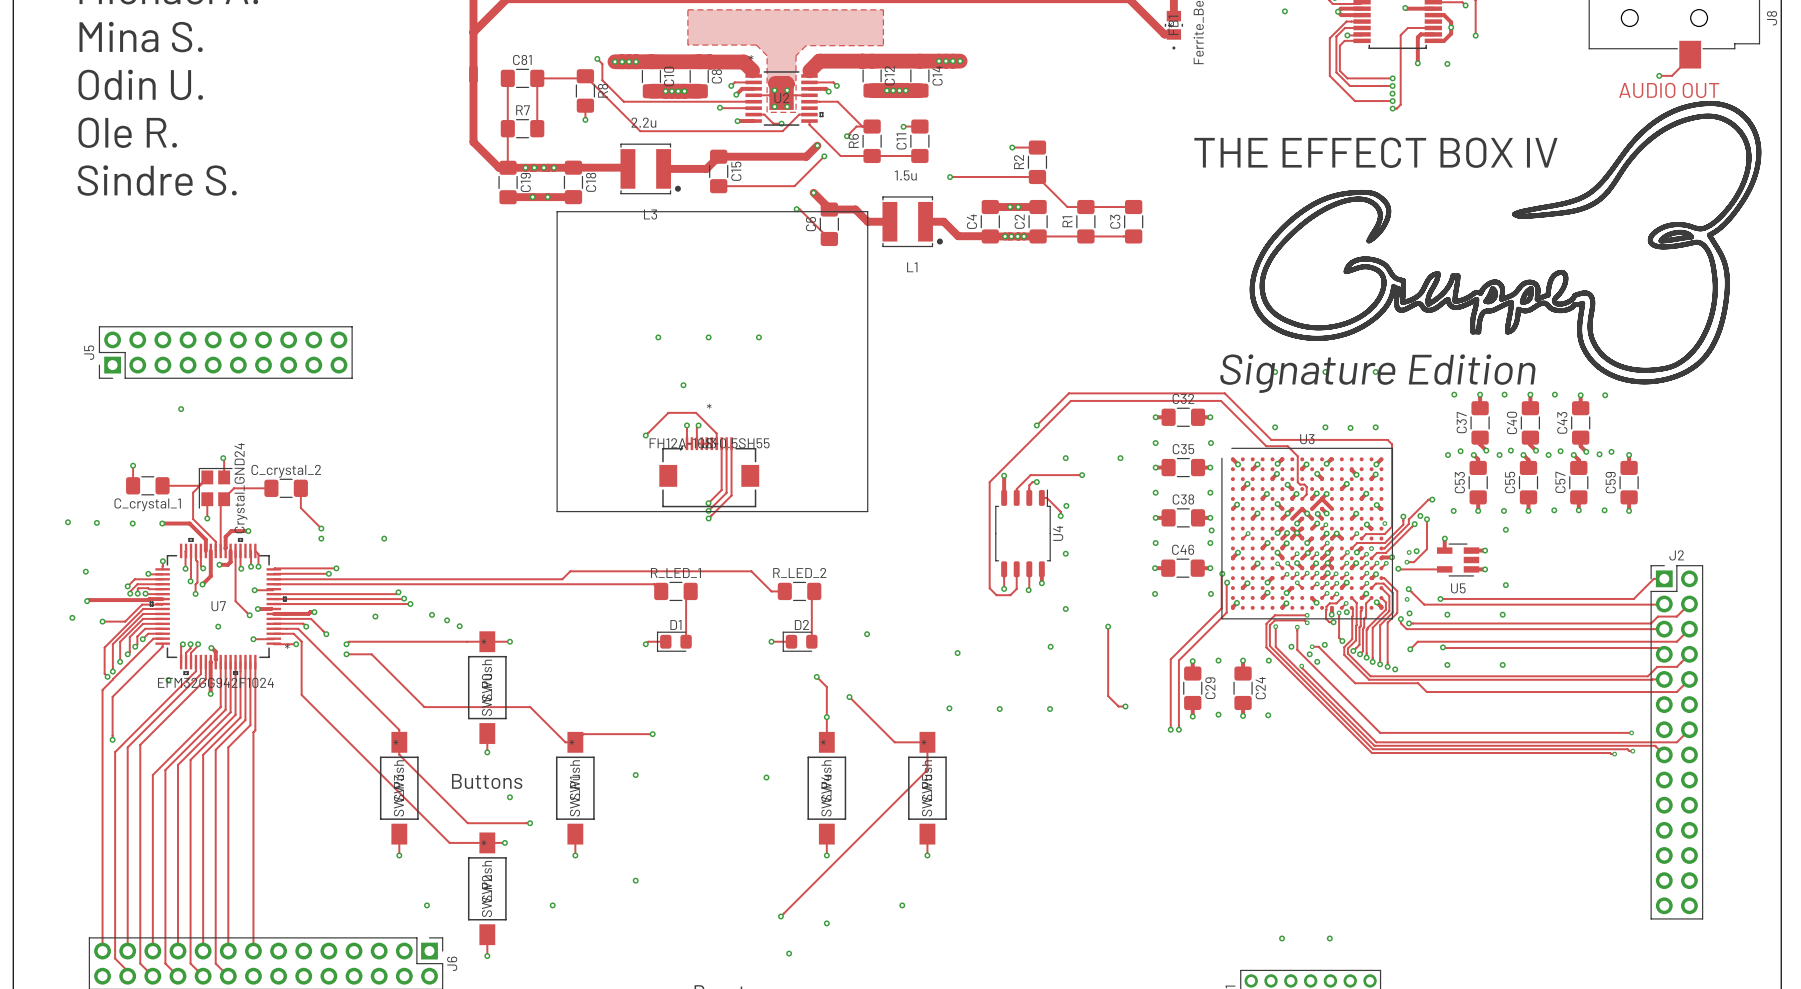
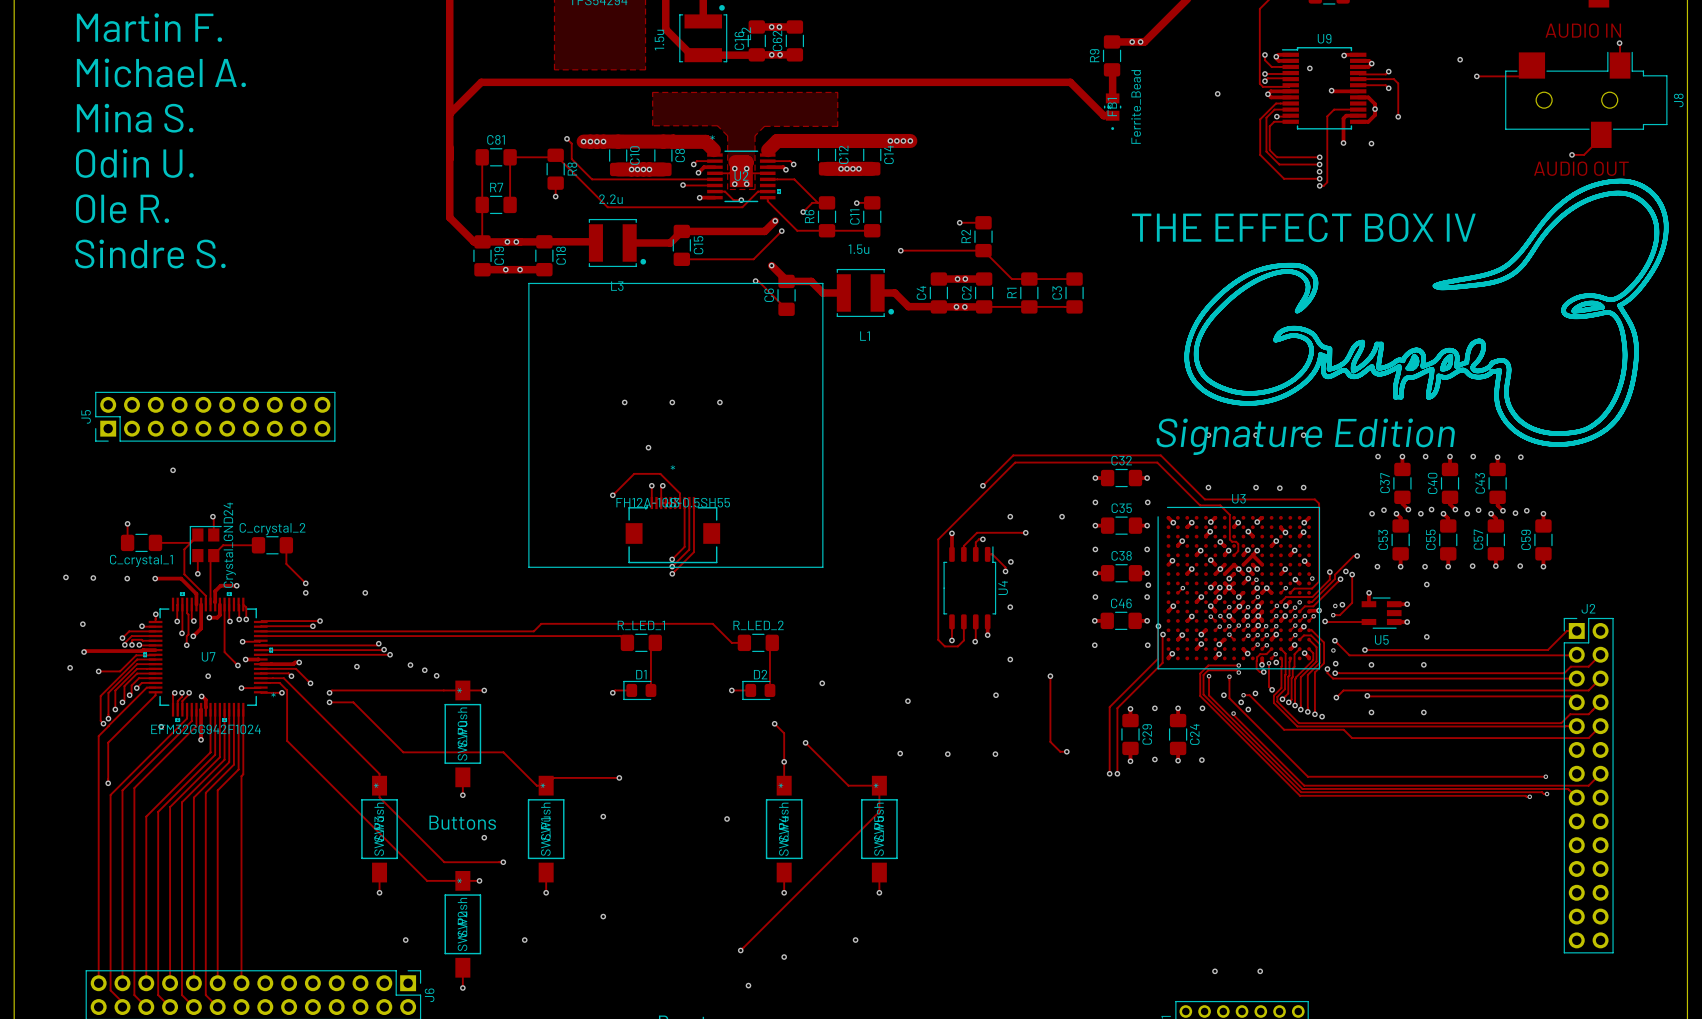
via: (525, 167) -> none
via: (553, 167) -> none
via: (1005, 236) -> none
via: none -> (956, 306)
via: (1011, 236) -> none
via: (1023, 236) -> none

